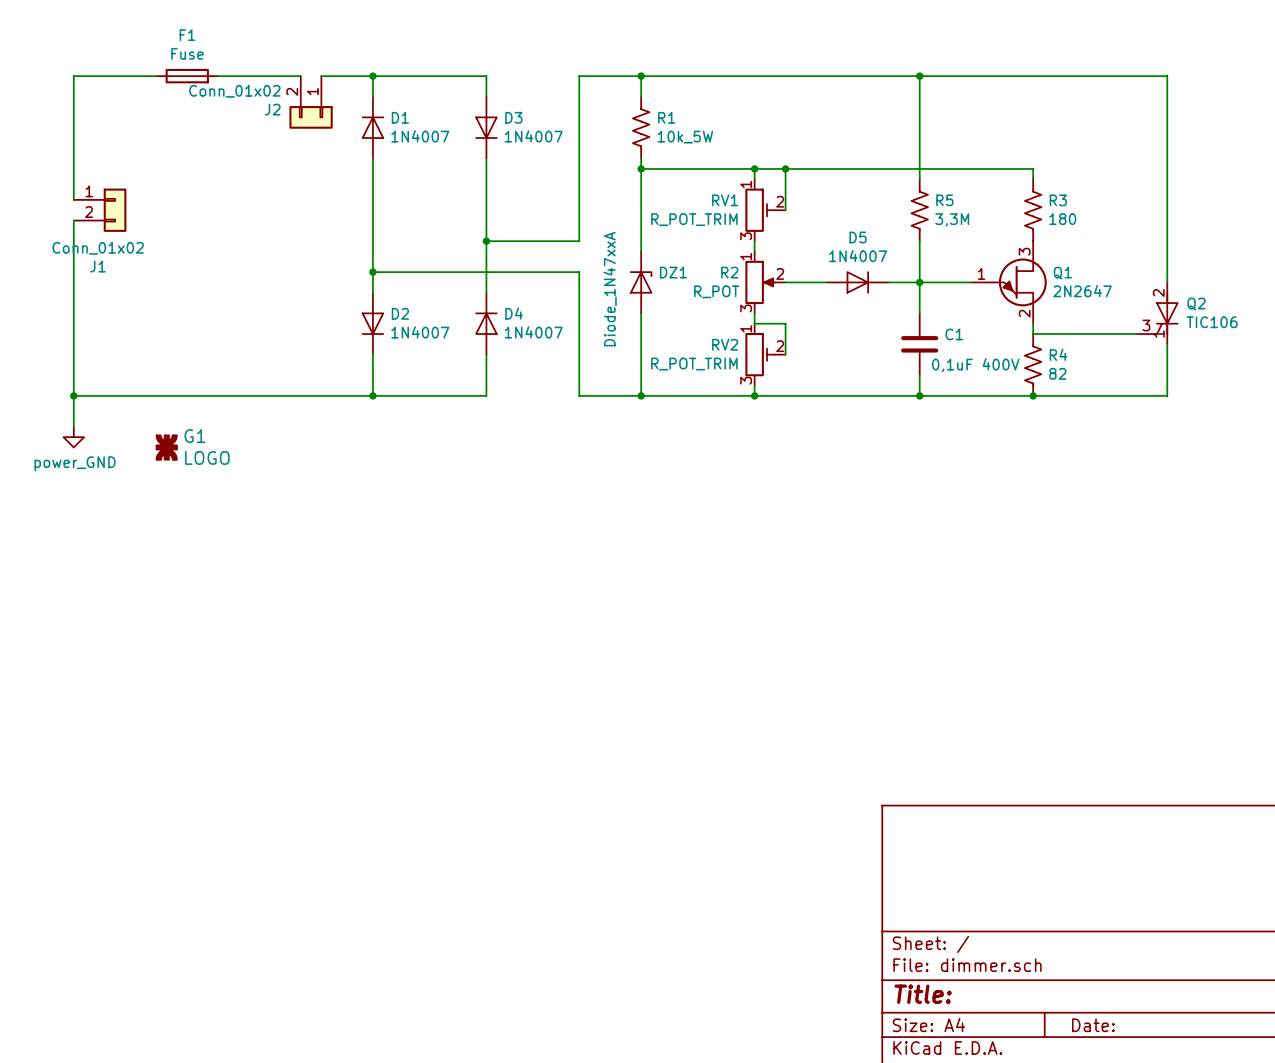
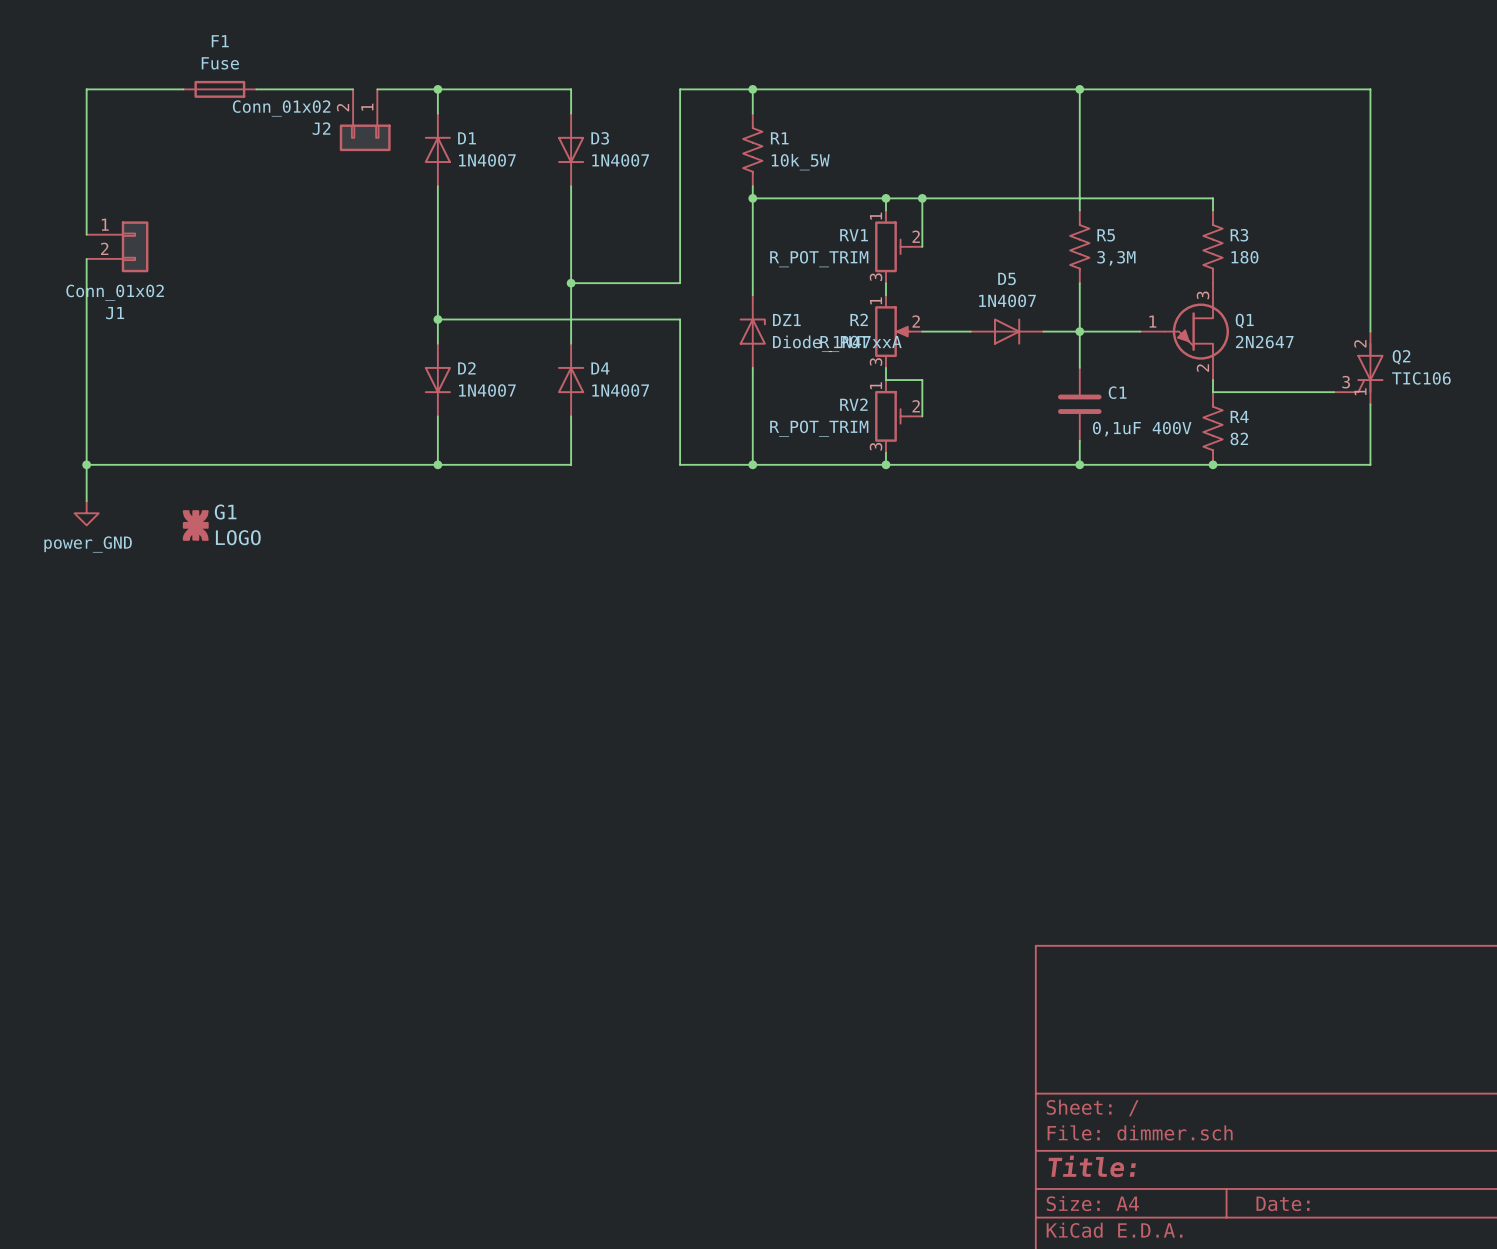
DZ1 value rotation: 0° (610, 289) -> 90° clockwise (837, 343)

